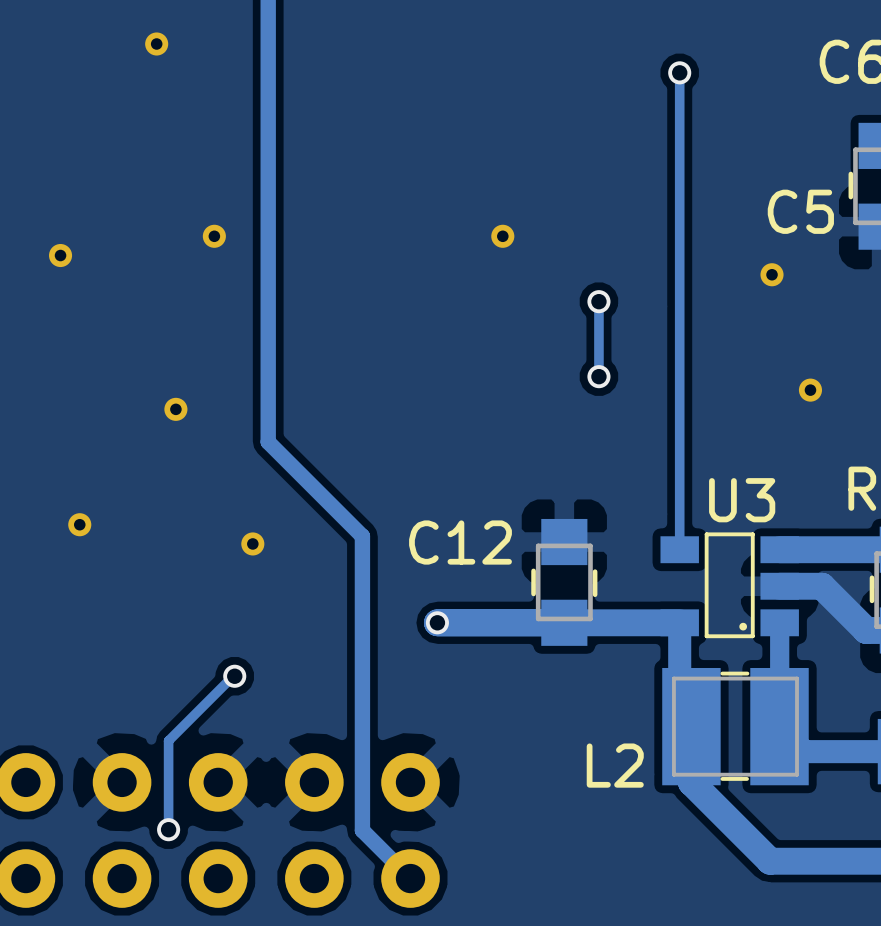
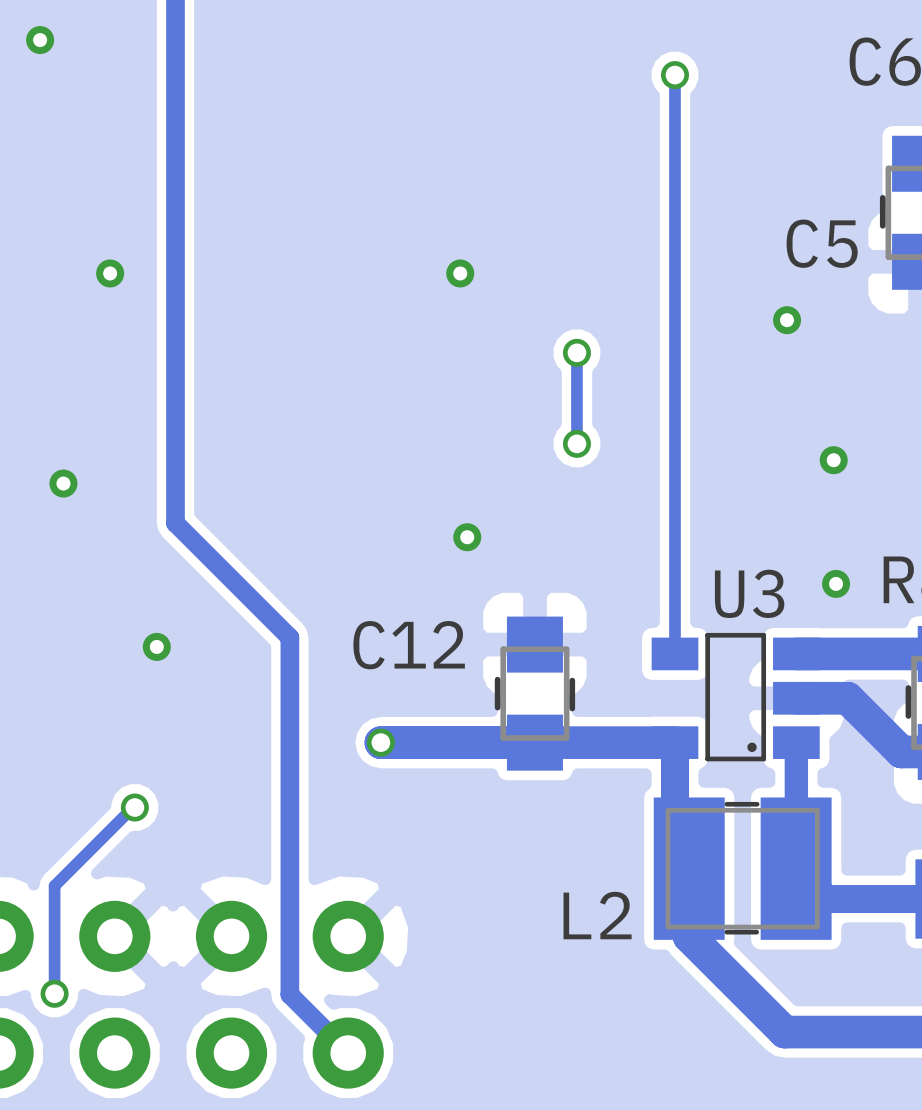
part: none -> (467, 537)
part: none -> (836, 583)

